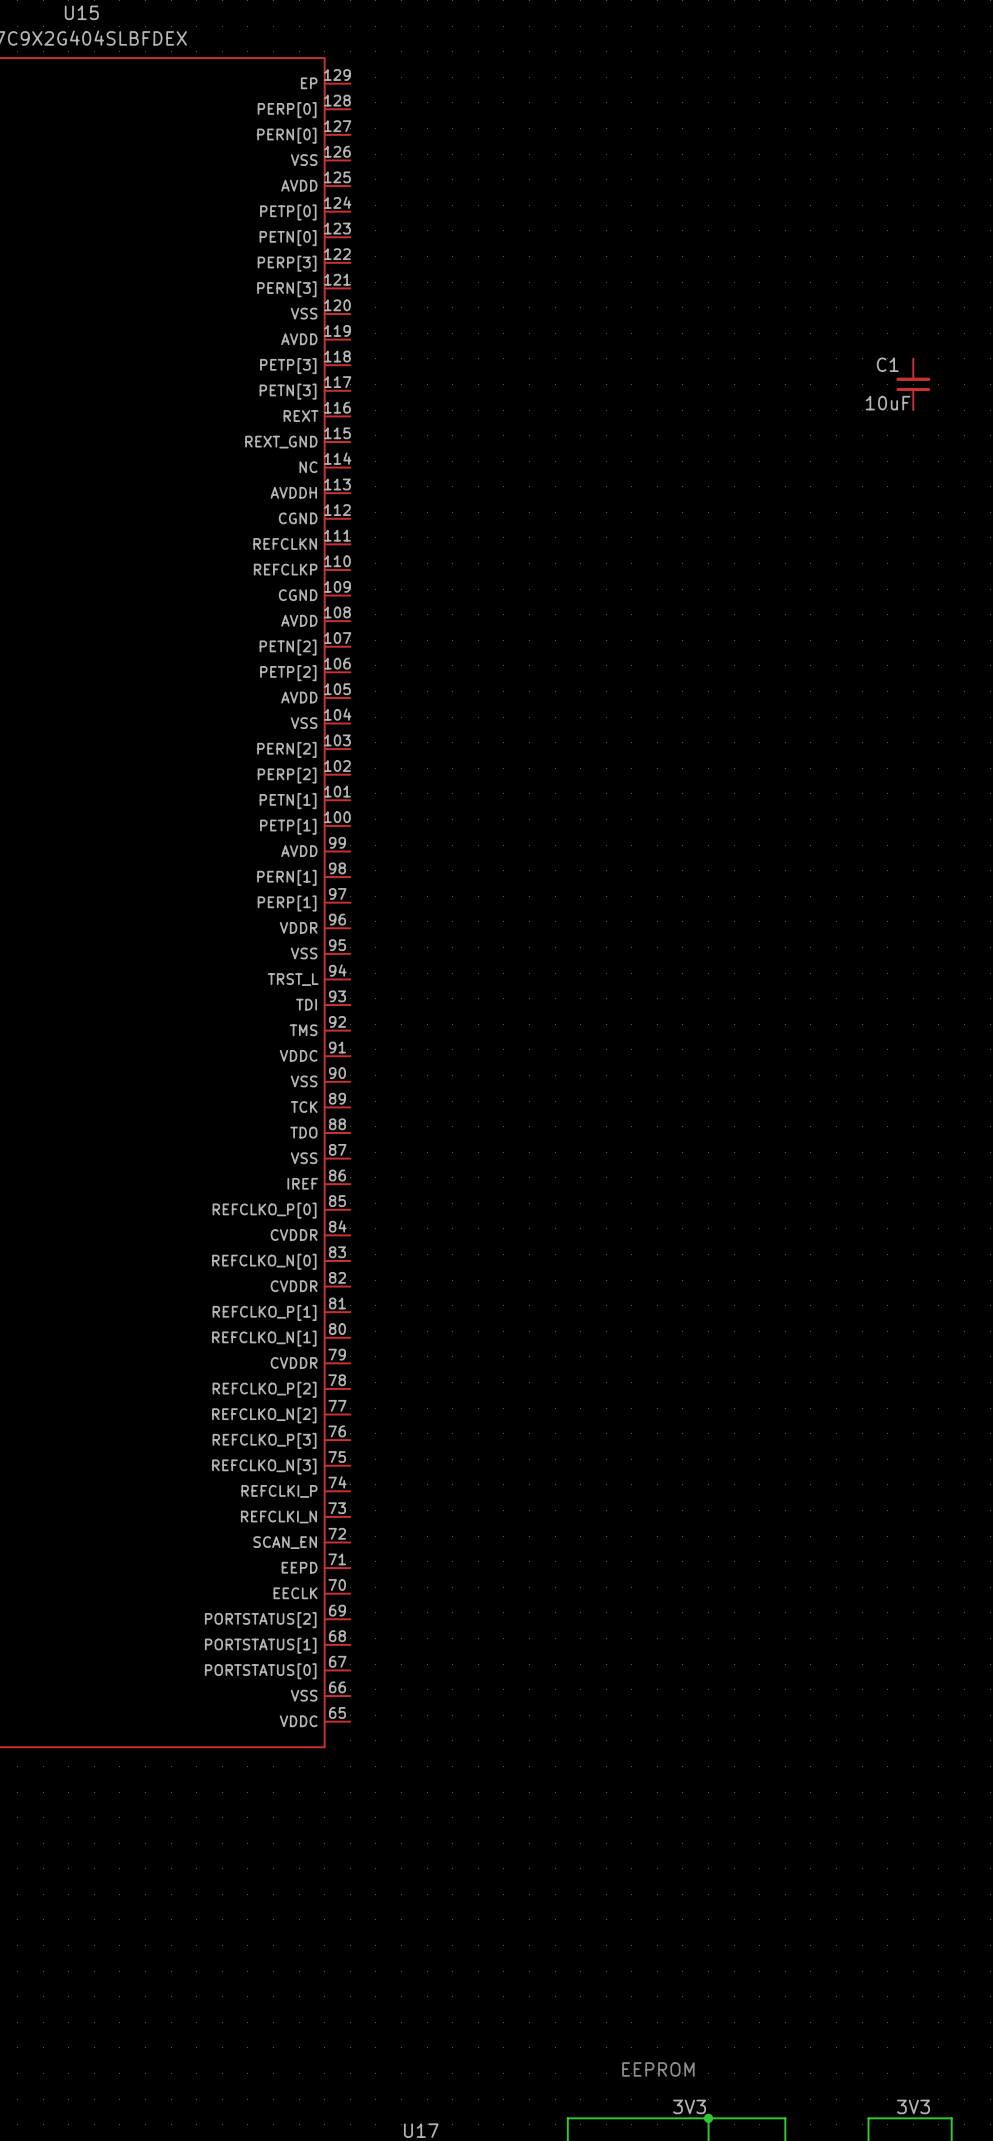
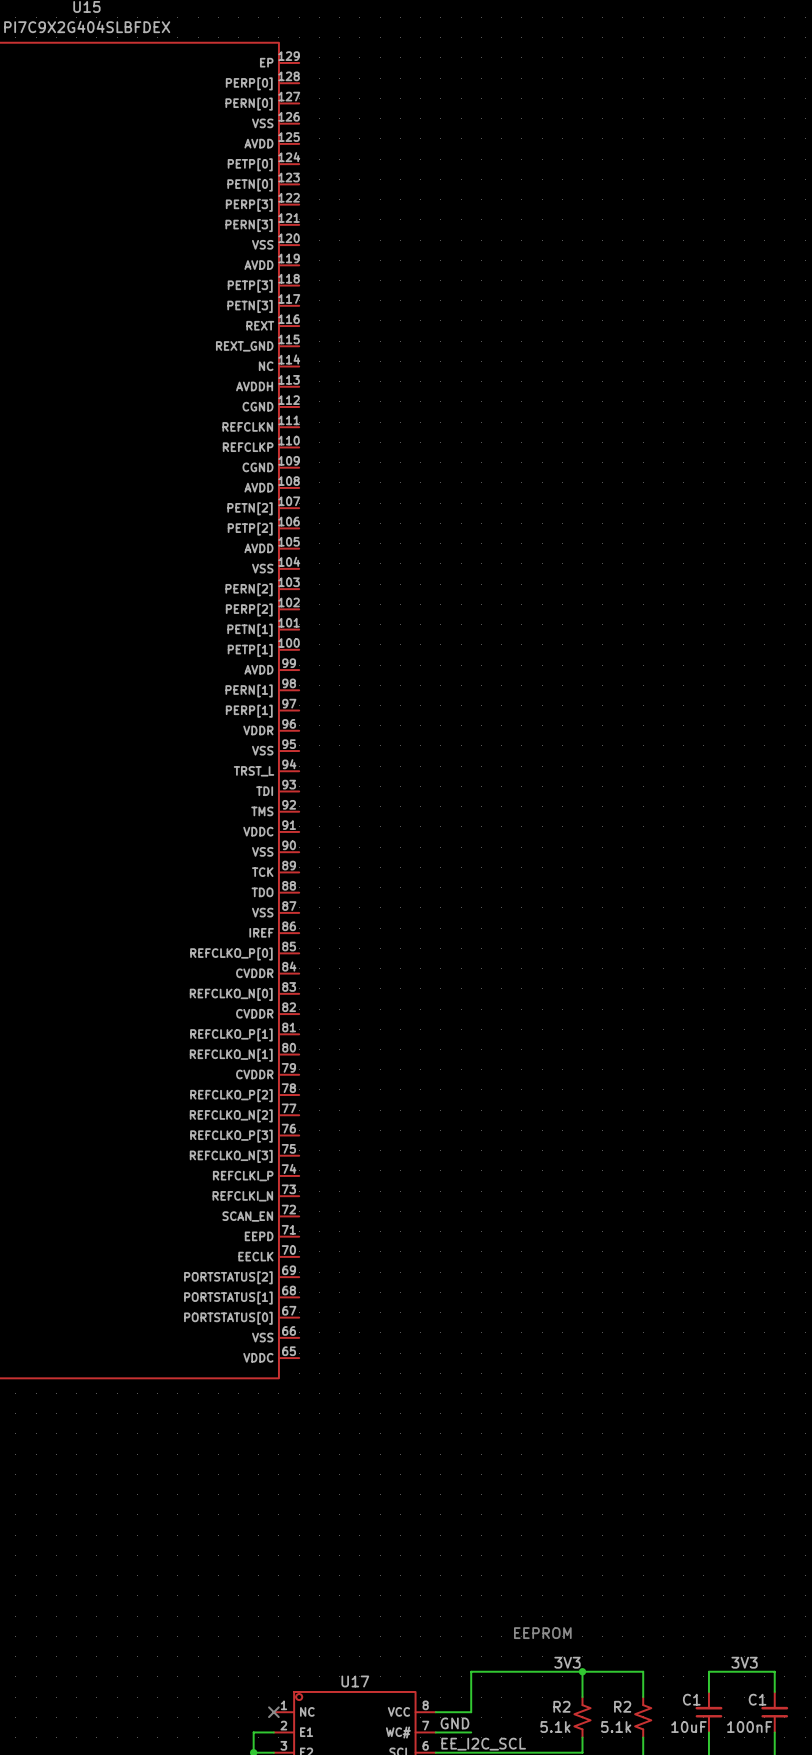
C1: 10uF (913, 384) -> none

